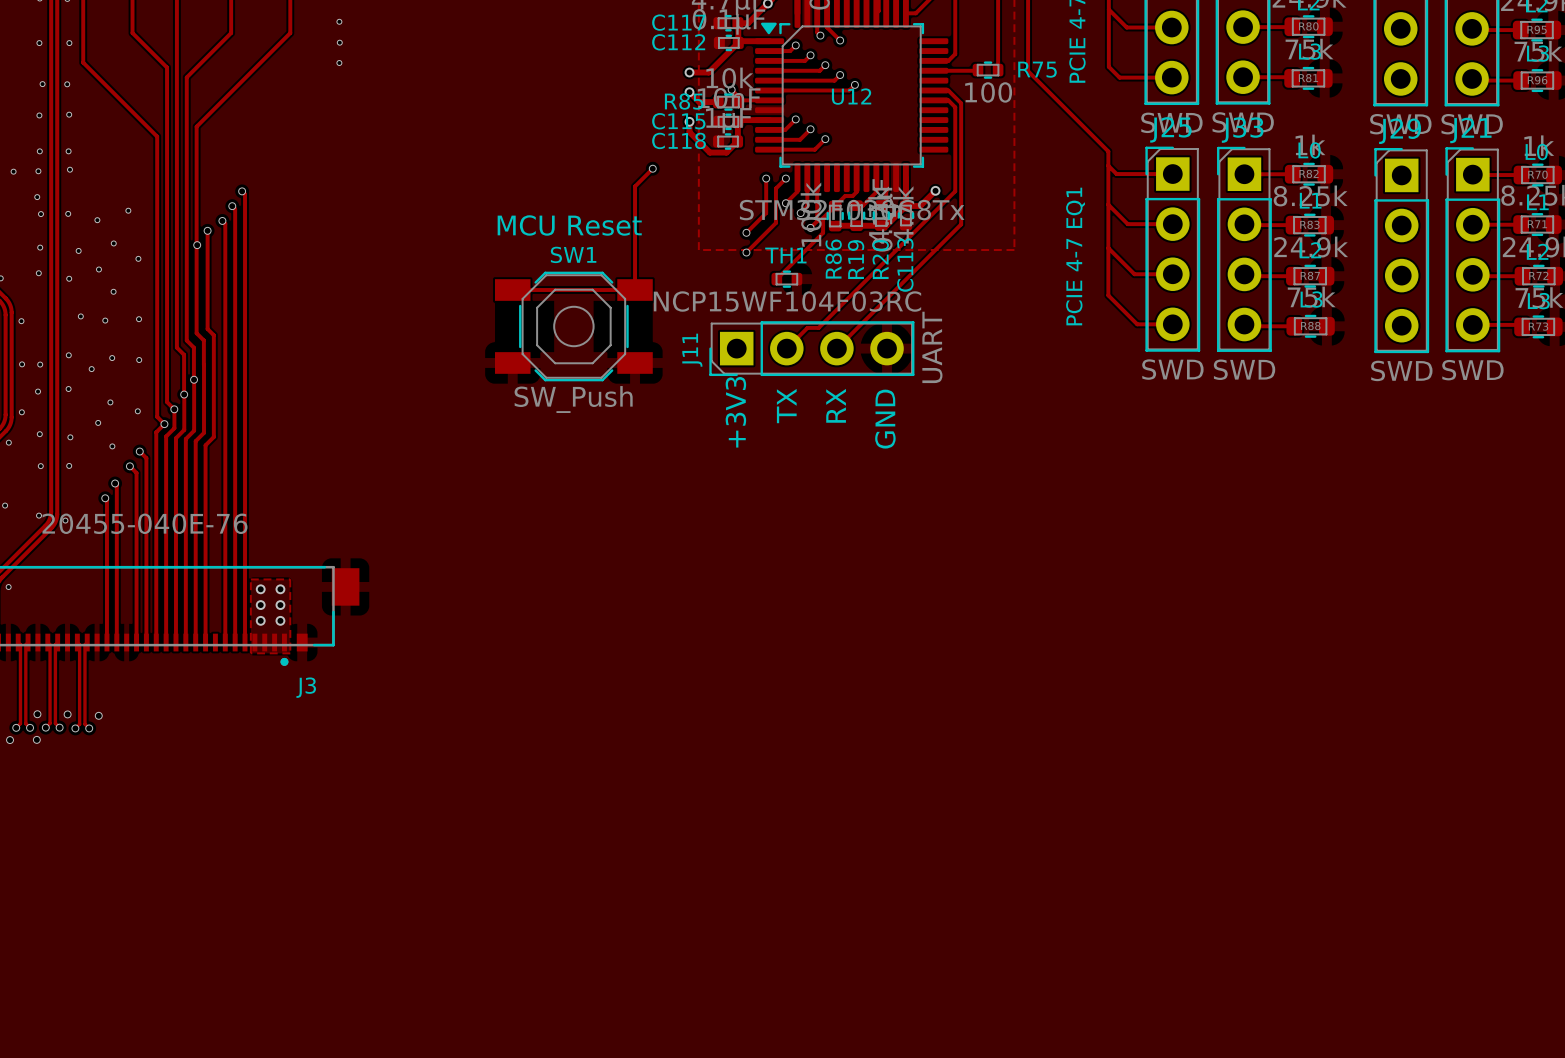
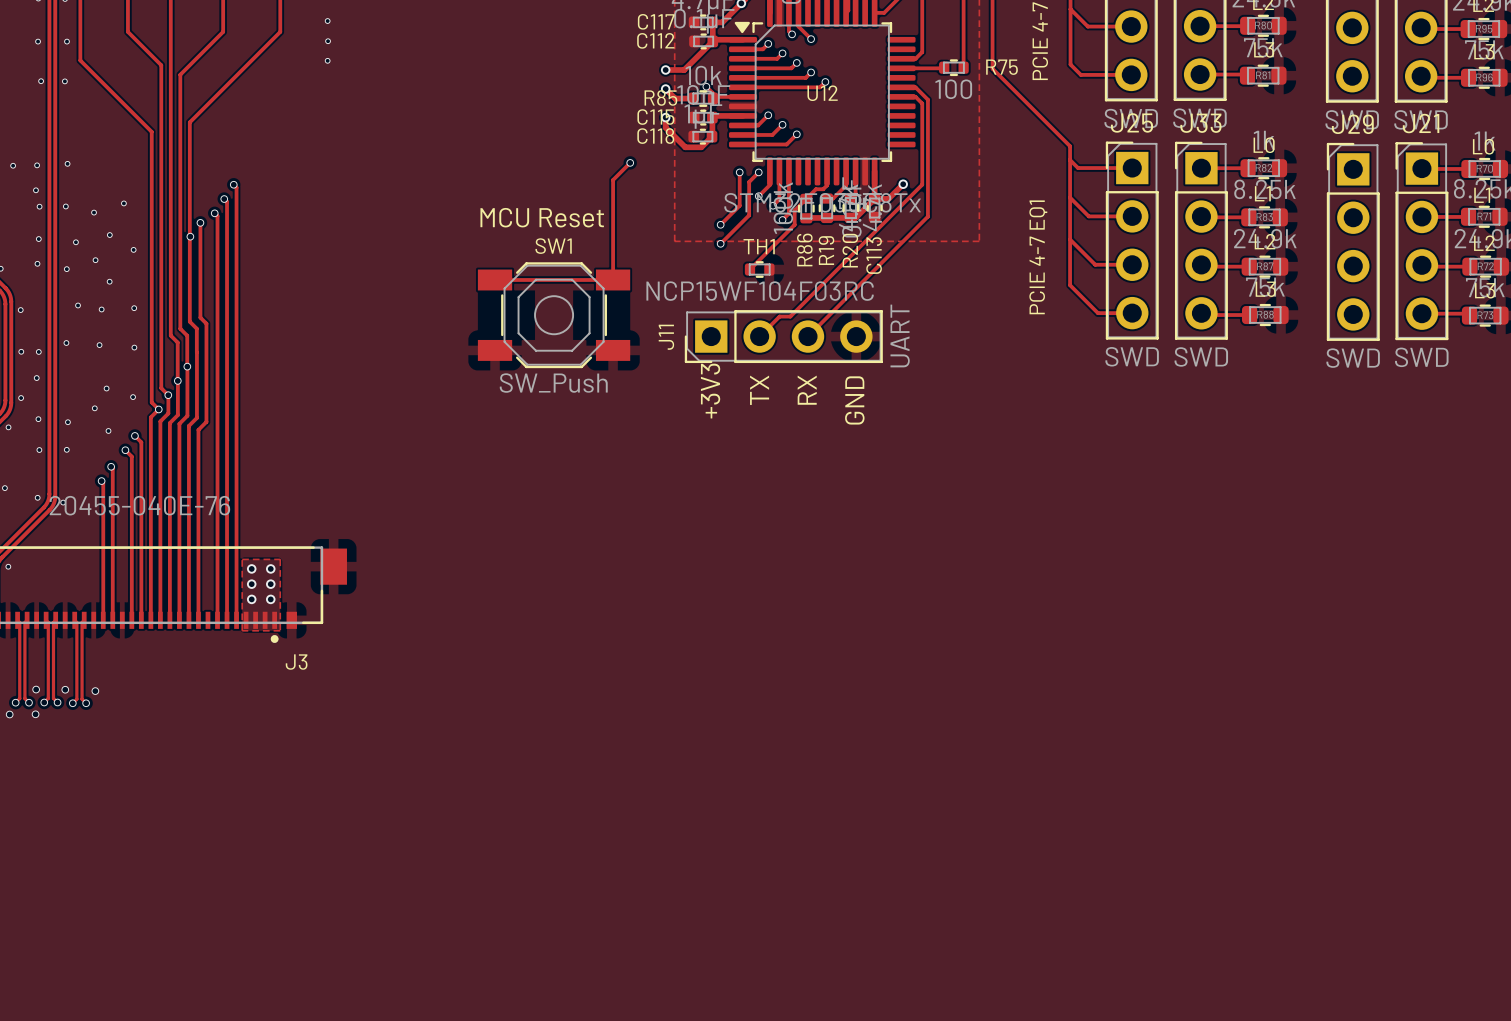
via: (69, 114) -> none
via: (39, 115) -> none
via: (39, 151) -> none
via: (68, 151) -> none
via: none -> (99, 345)
via: (112, 358) -> none
via: (91, 369) -> none
via: (68, 389) -> none

